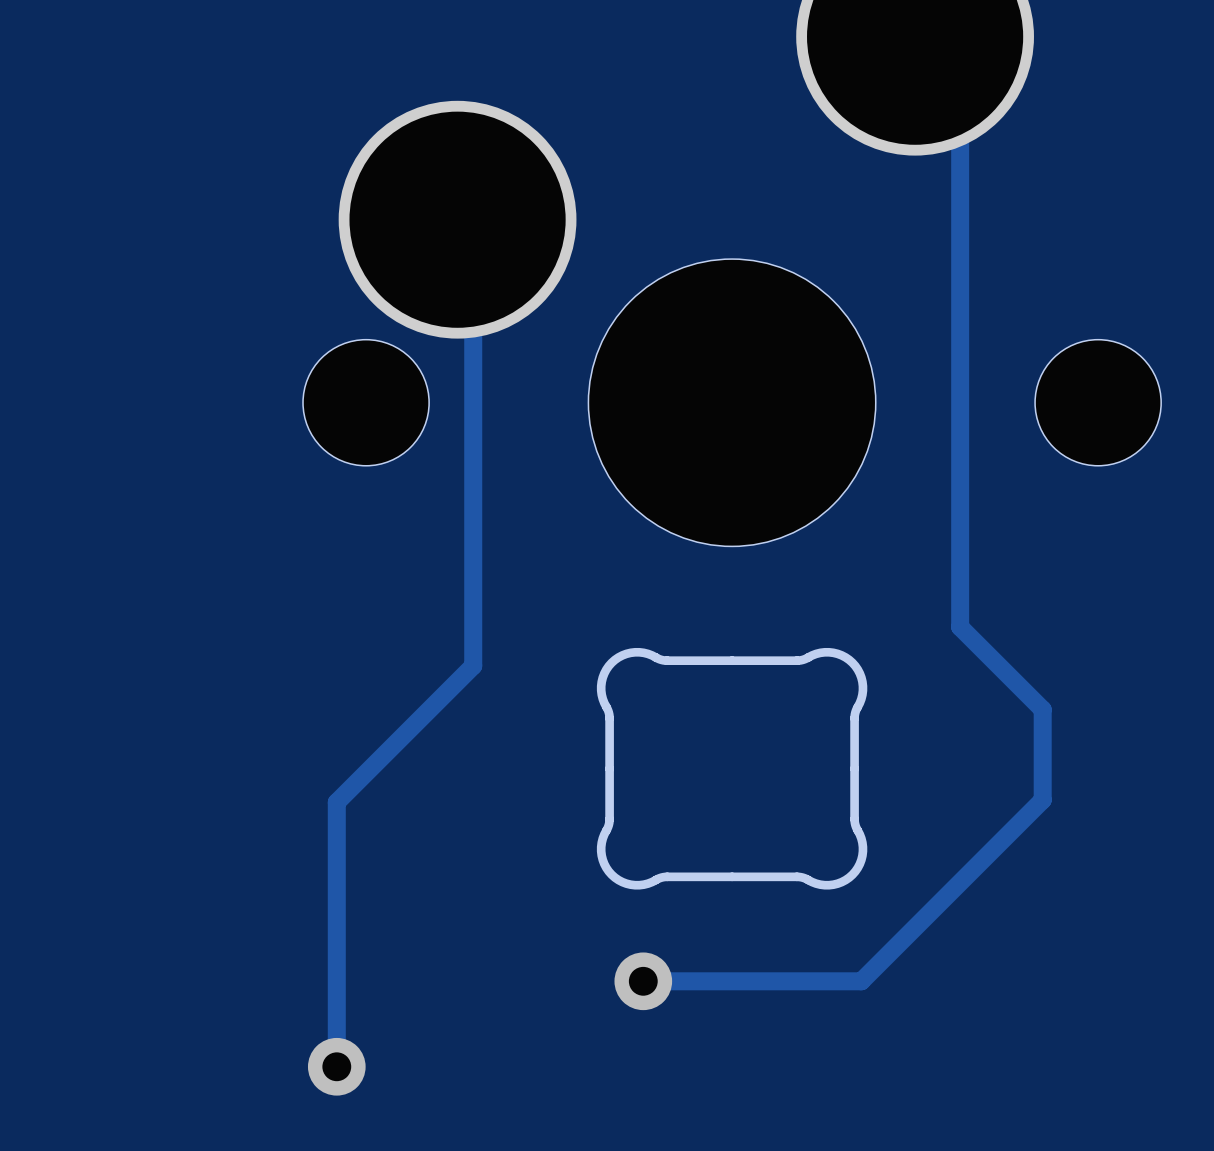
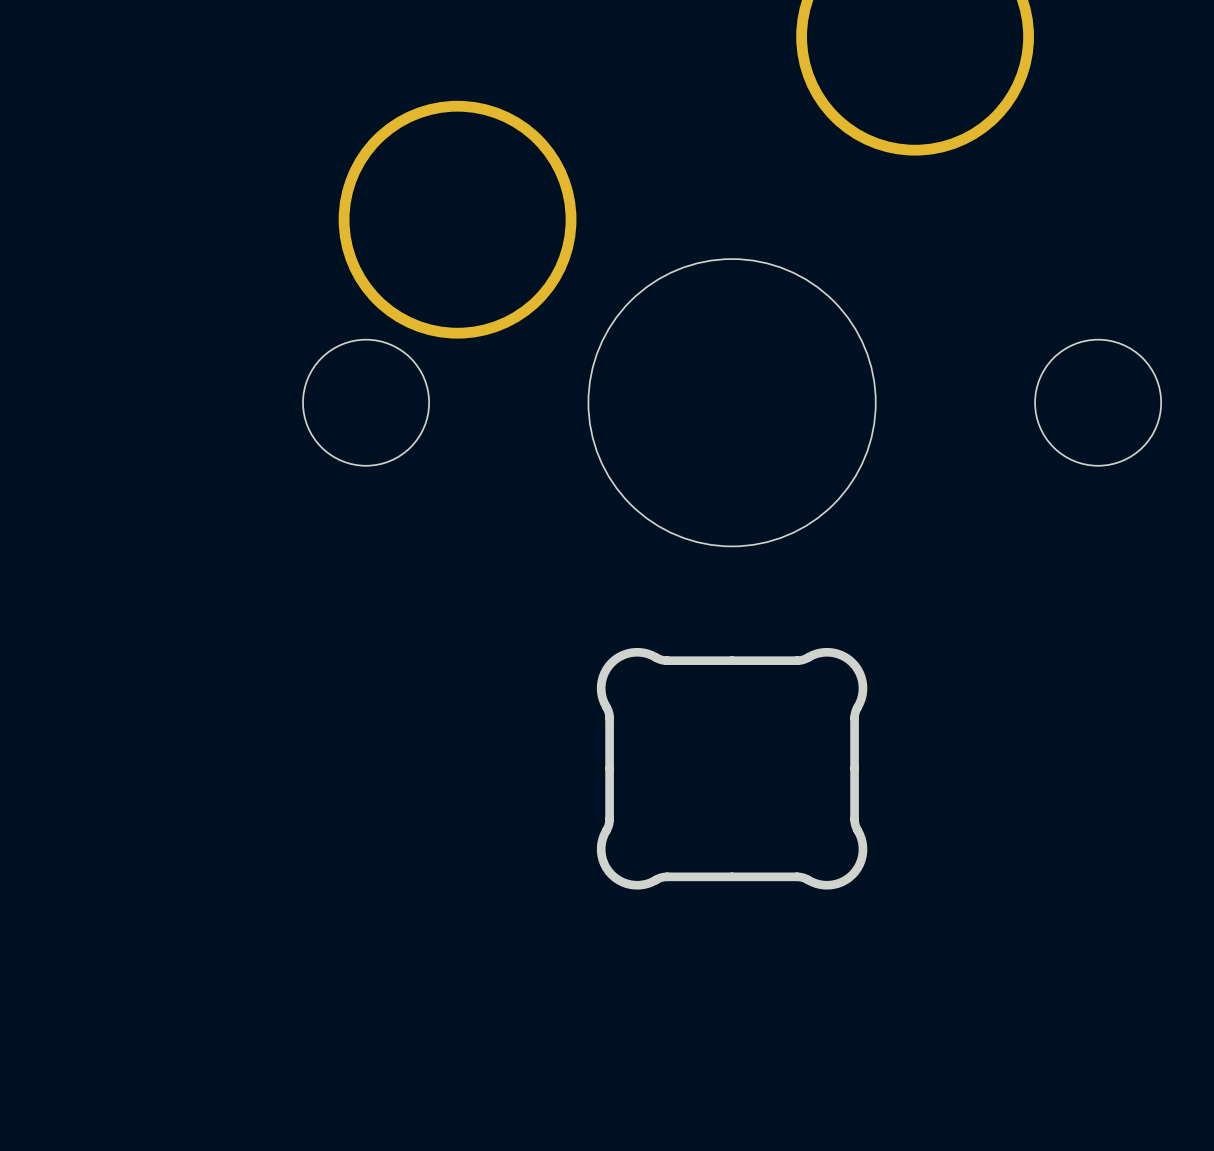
track: (915, 36) (960, 81) (960, 627) (1042, 709) (1042, 800) (861, 981) (643, 981) -> none
track: (457, 219) (473, 235) (473, 665) (336, 802) (336, 1066) -> none
via: (643, 981) -> none
via: (336, 1066) -> none

